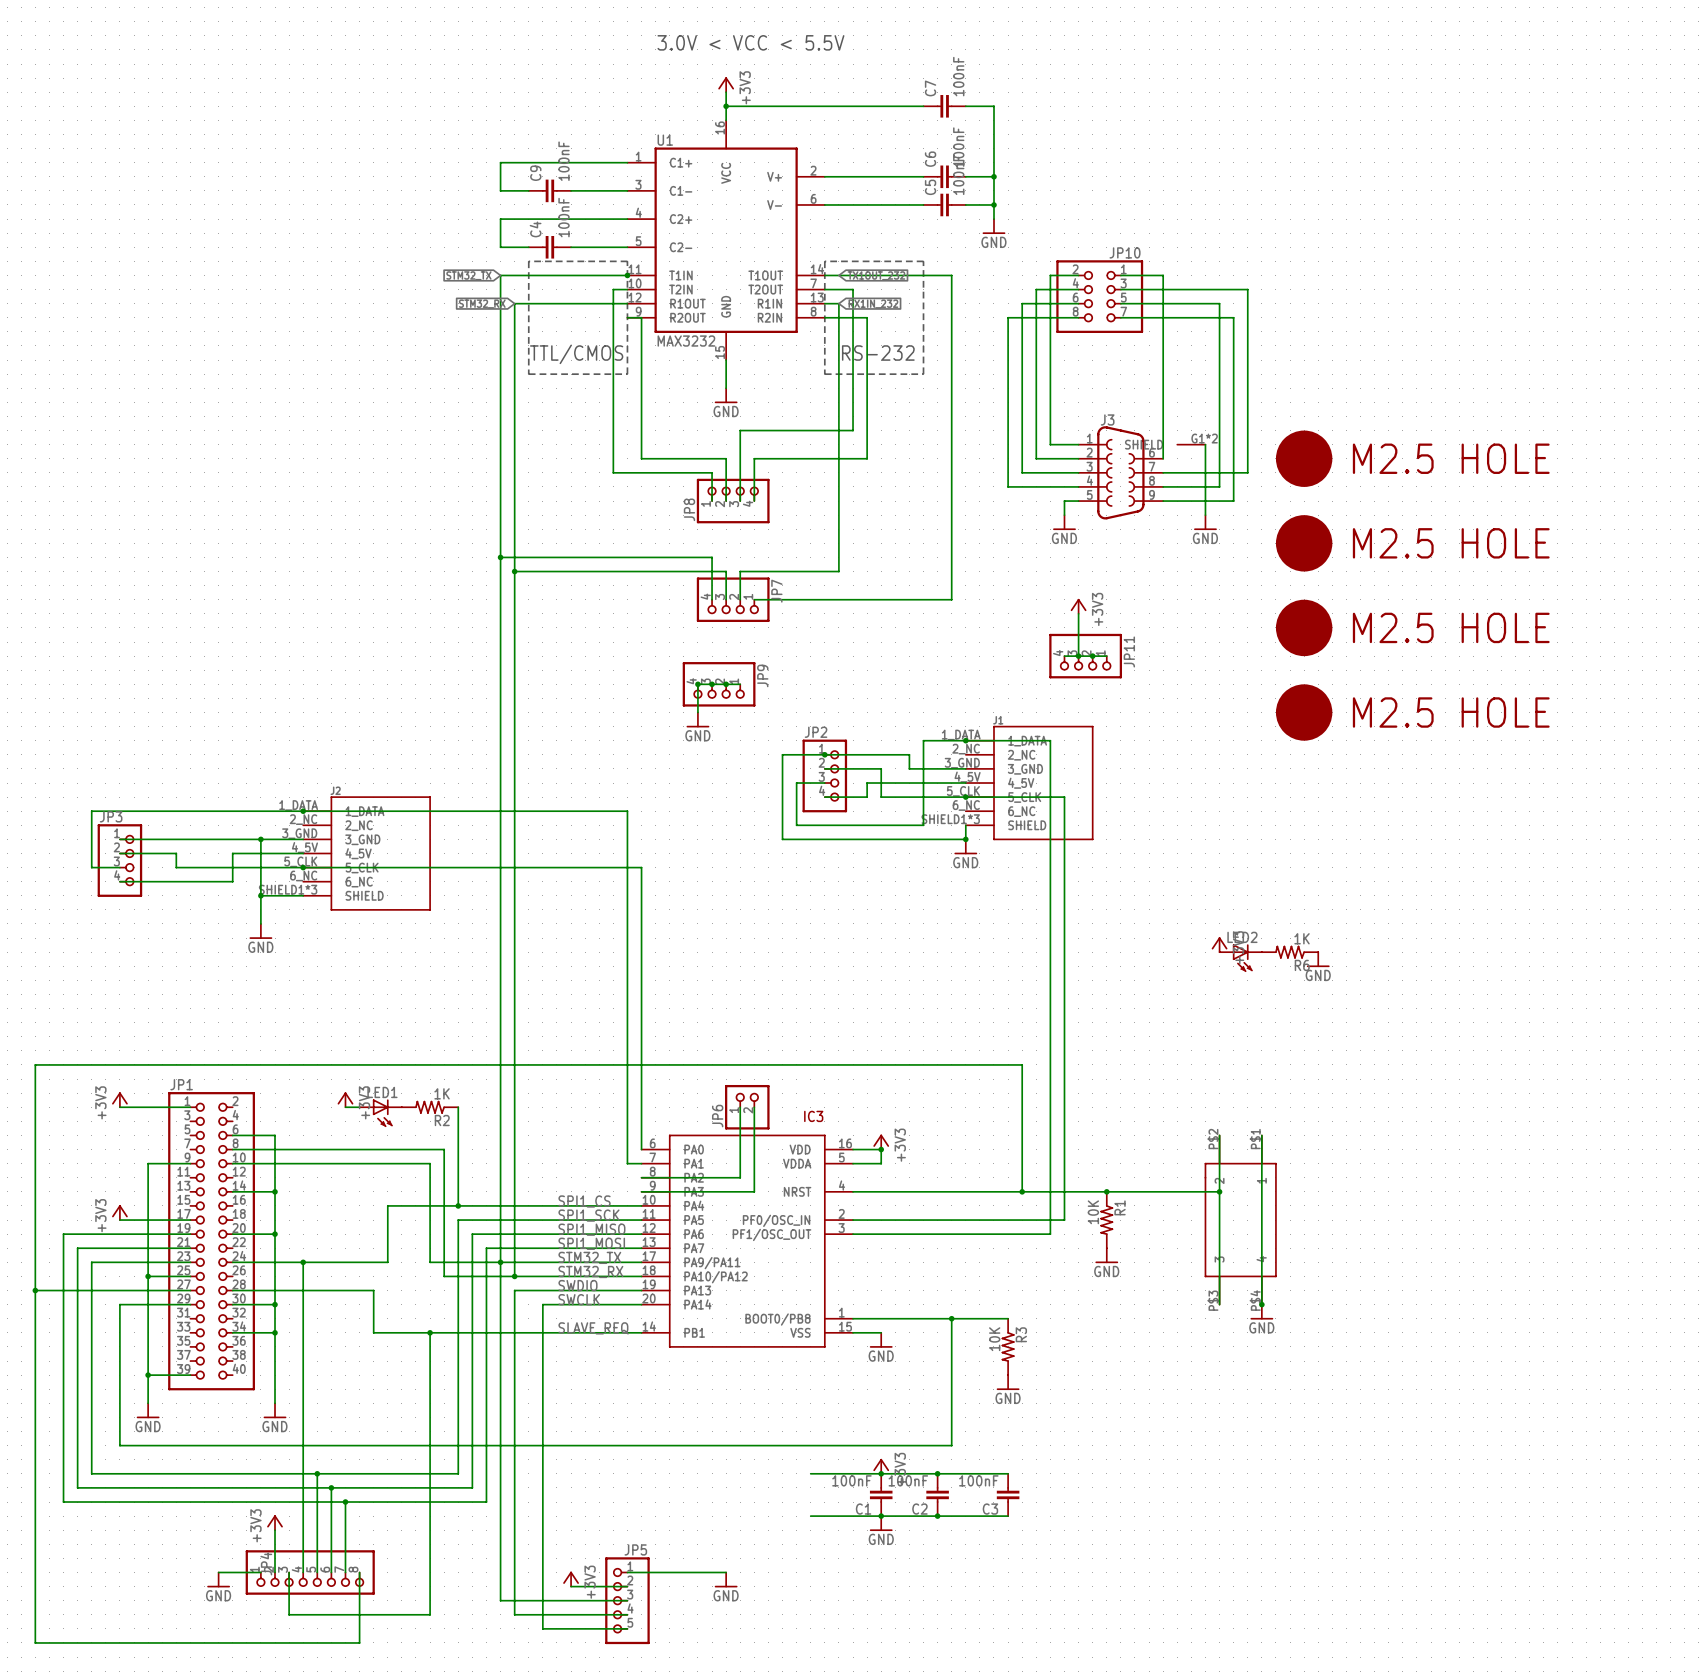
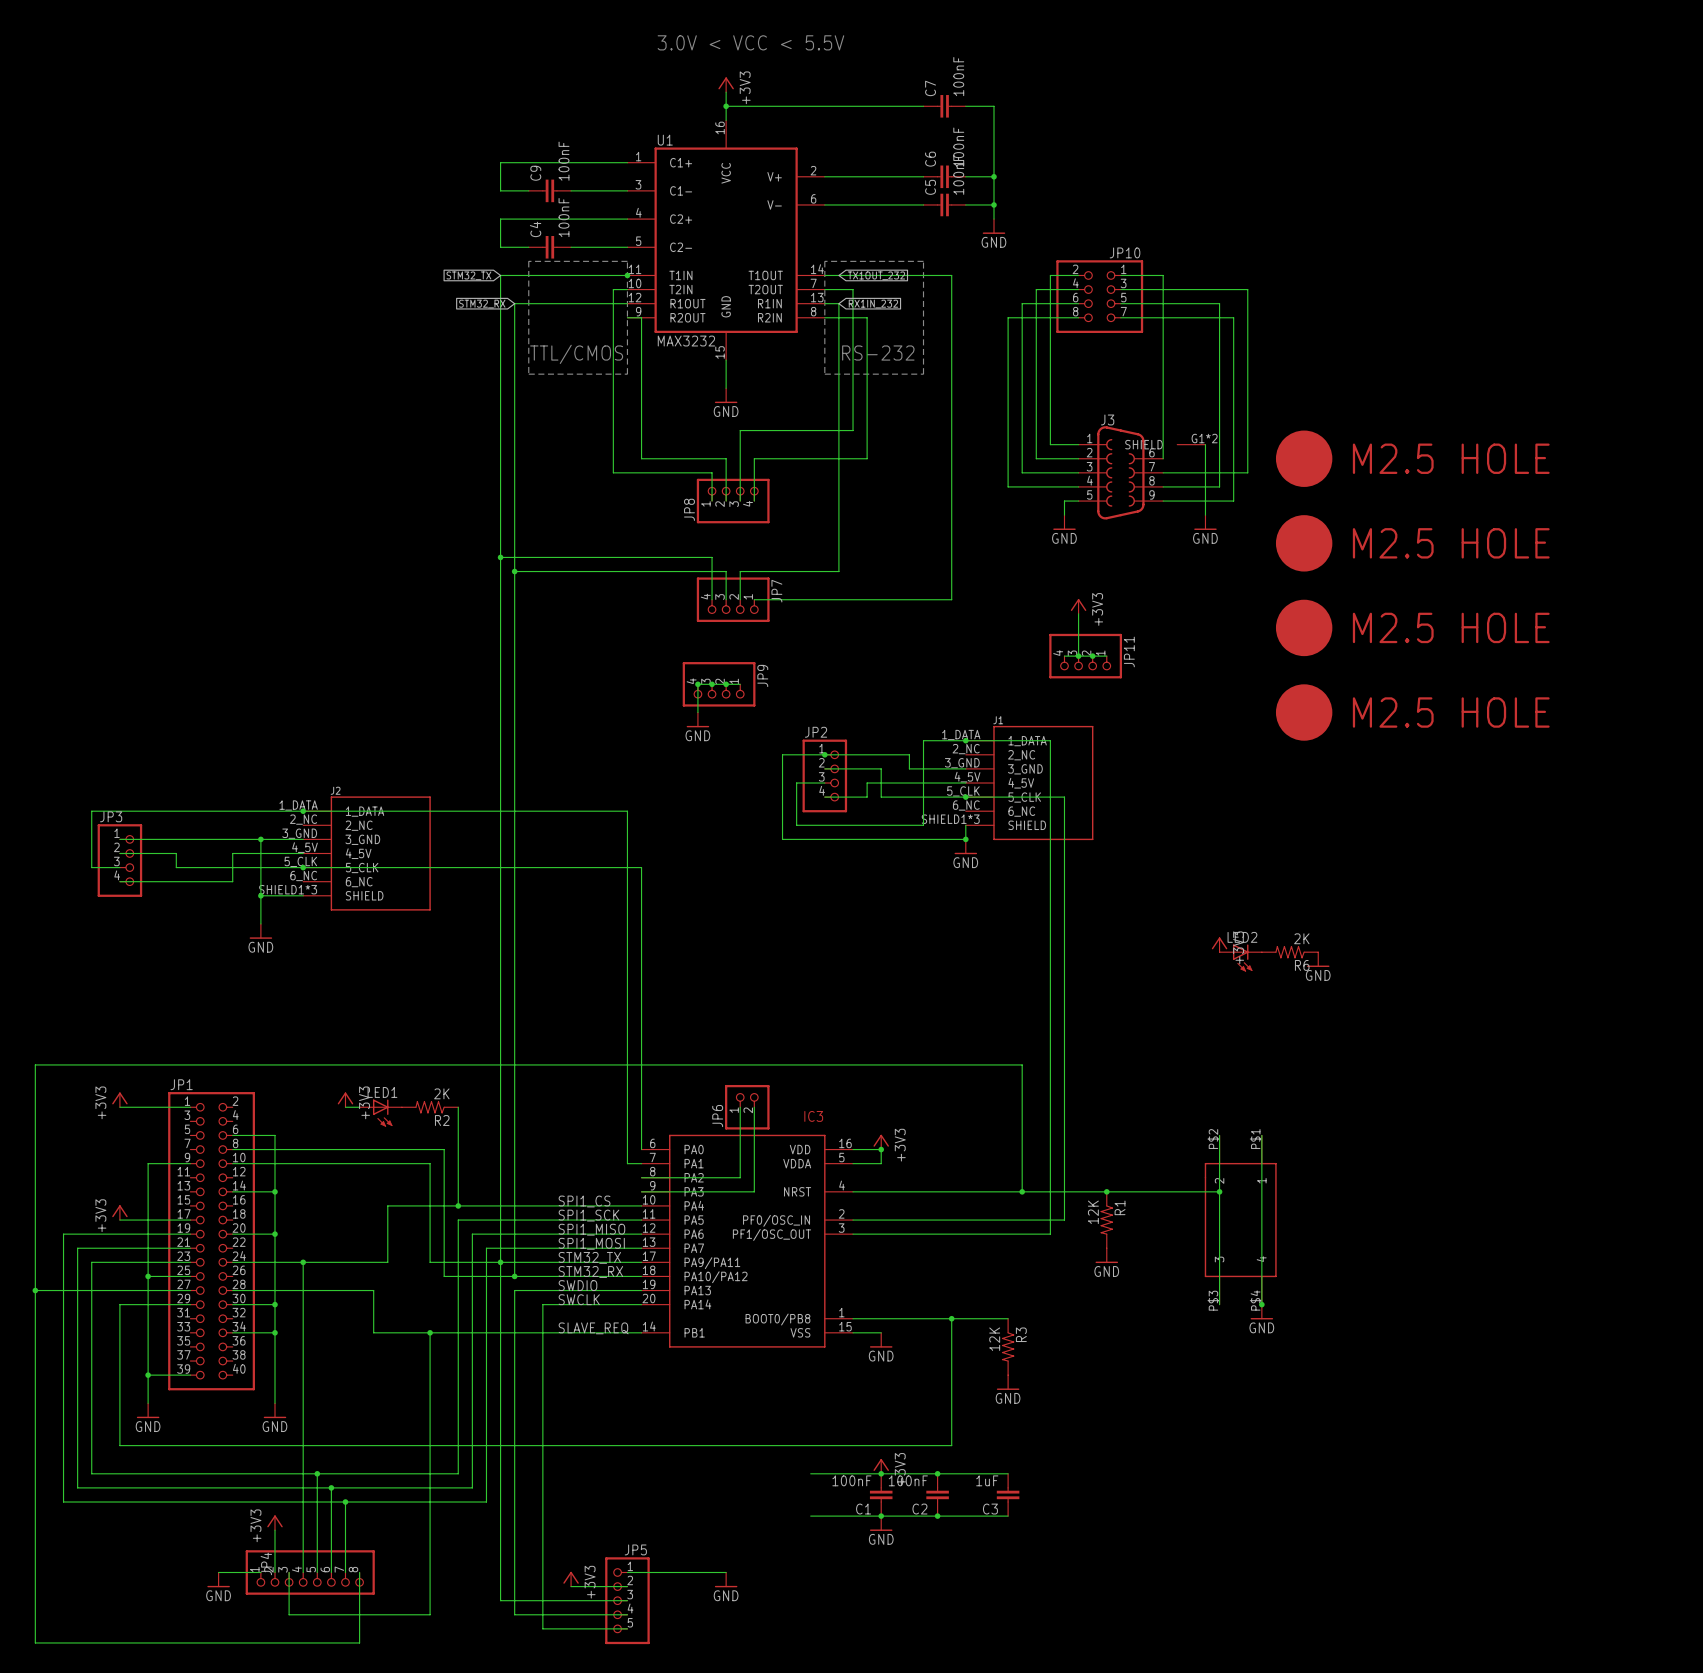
R6 value: 1K (1302, 938) -> 2K (1301, 938)
R2 value: 1K (442, 1093) -> 2K (441, 1093)
R1 value: 10K (1093, 1212) -> 12K (1093, 1212)
R3 value: 10K (994, 1339) -> 12K (994, 1339)
C3 value: 100nF (978, 1480) -> 1uF (987, 1480)

